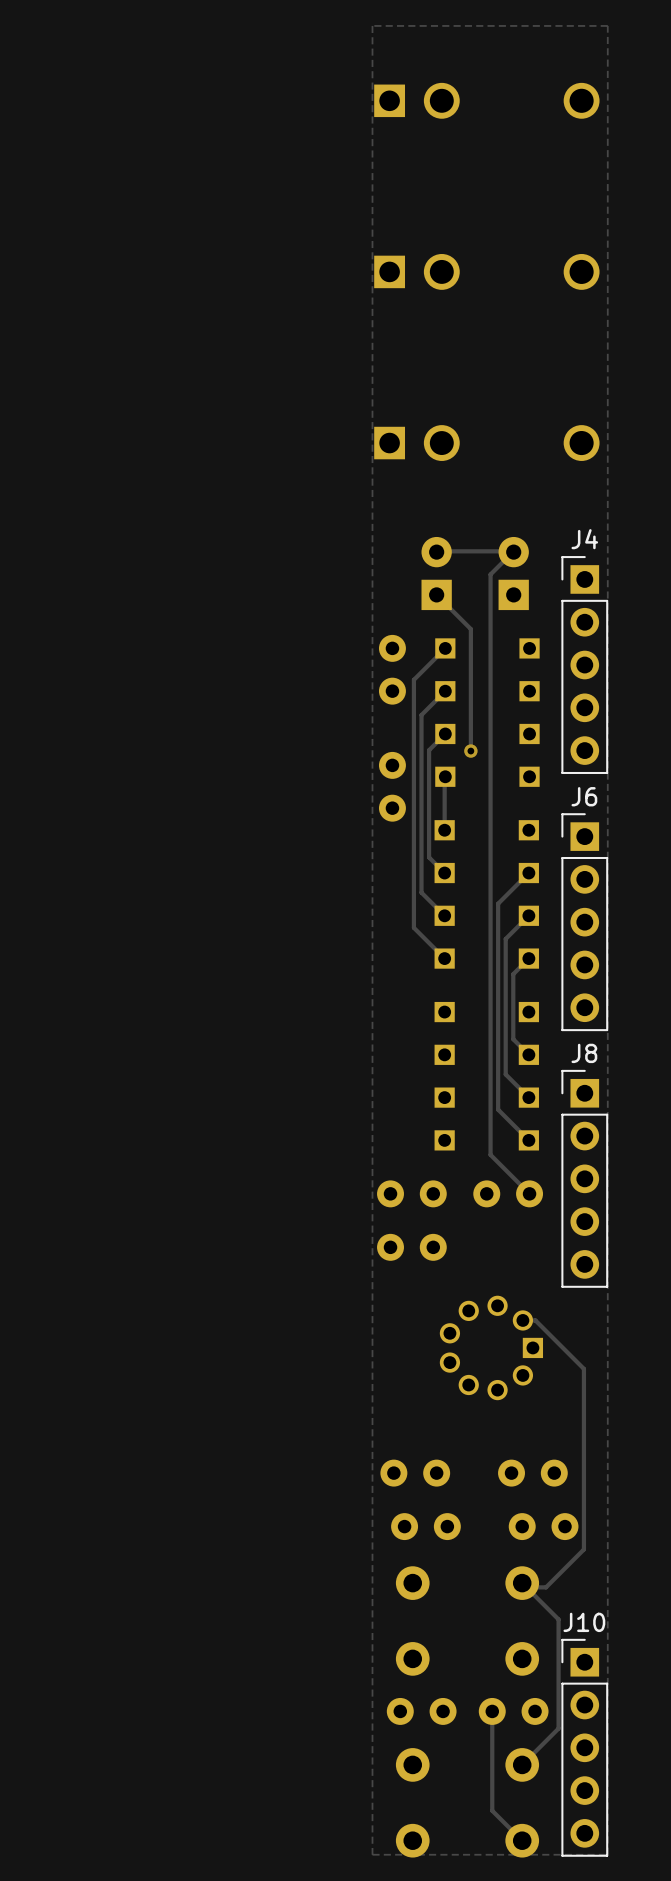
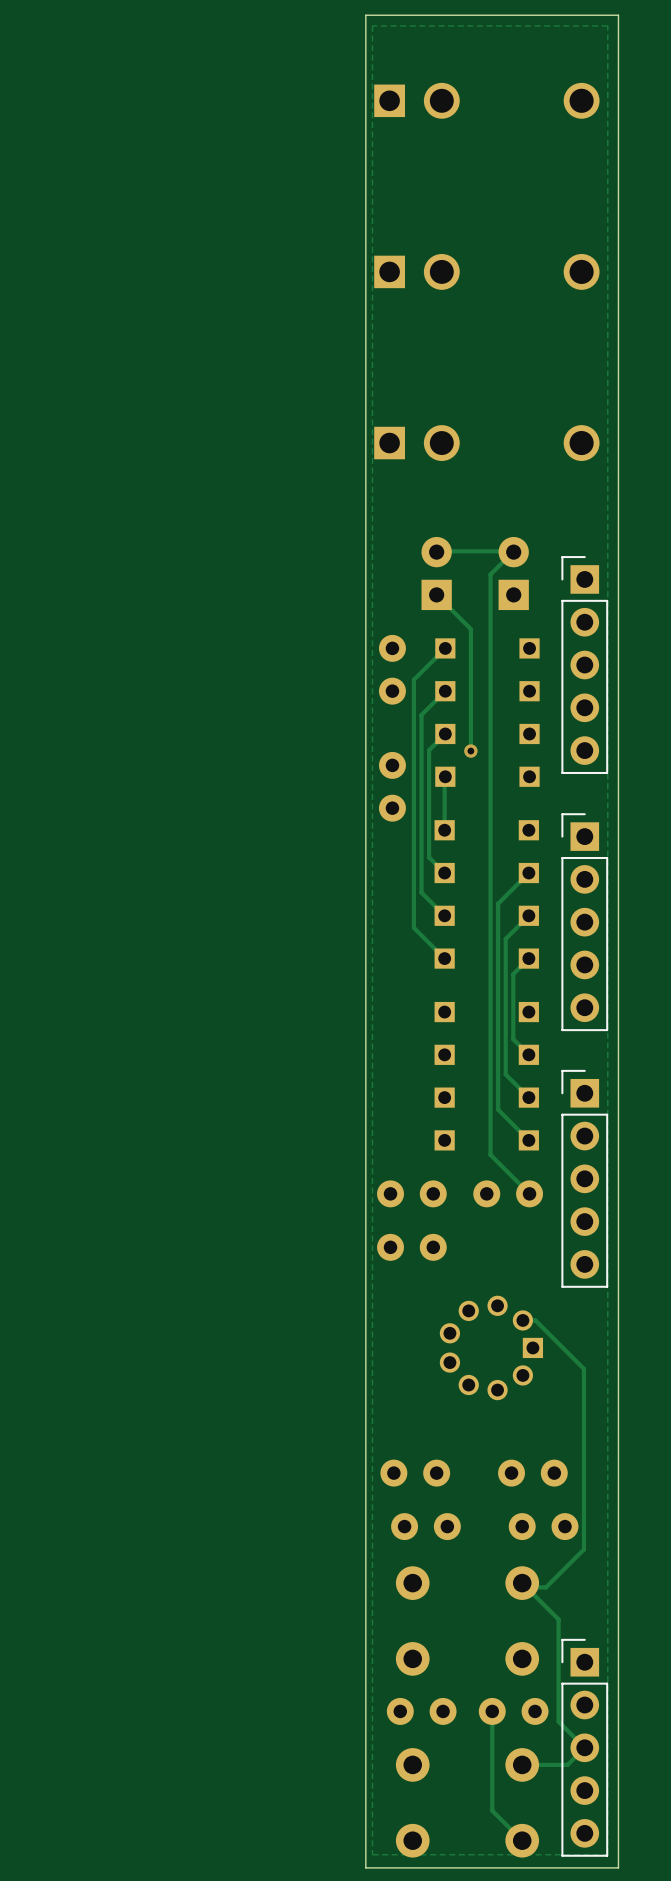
board edge: none -> (618, 15) (365, 15) (365, 1867) (618, 1867) (618, 15)
J4 name: J4 (584, 539) -> none
J6 name: J6 (584, 796) -> none
J8 name: J8 (584, 1053) -> none
J10 name: J10 (584, 1622) -> none
track: (558, 1721) (558, 1728) (522, 1764) -> (558, 1721) (584, 1747) (567, 1764) (522, 1764)

